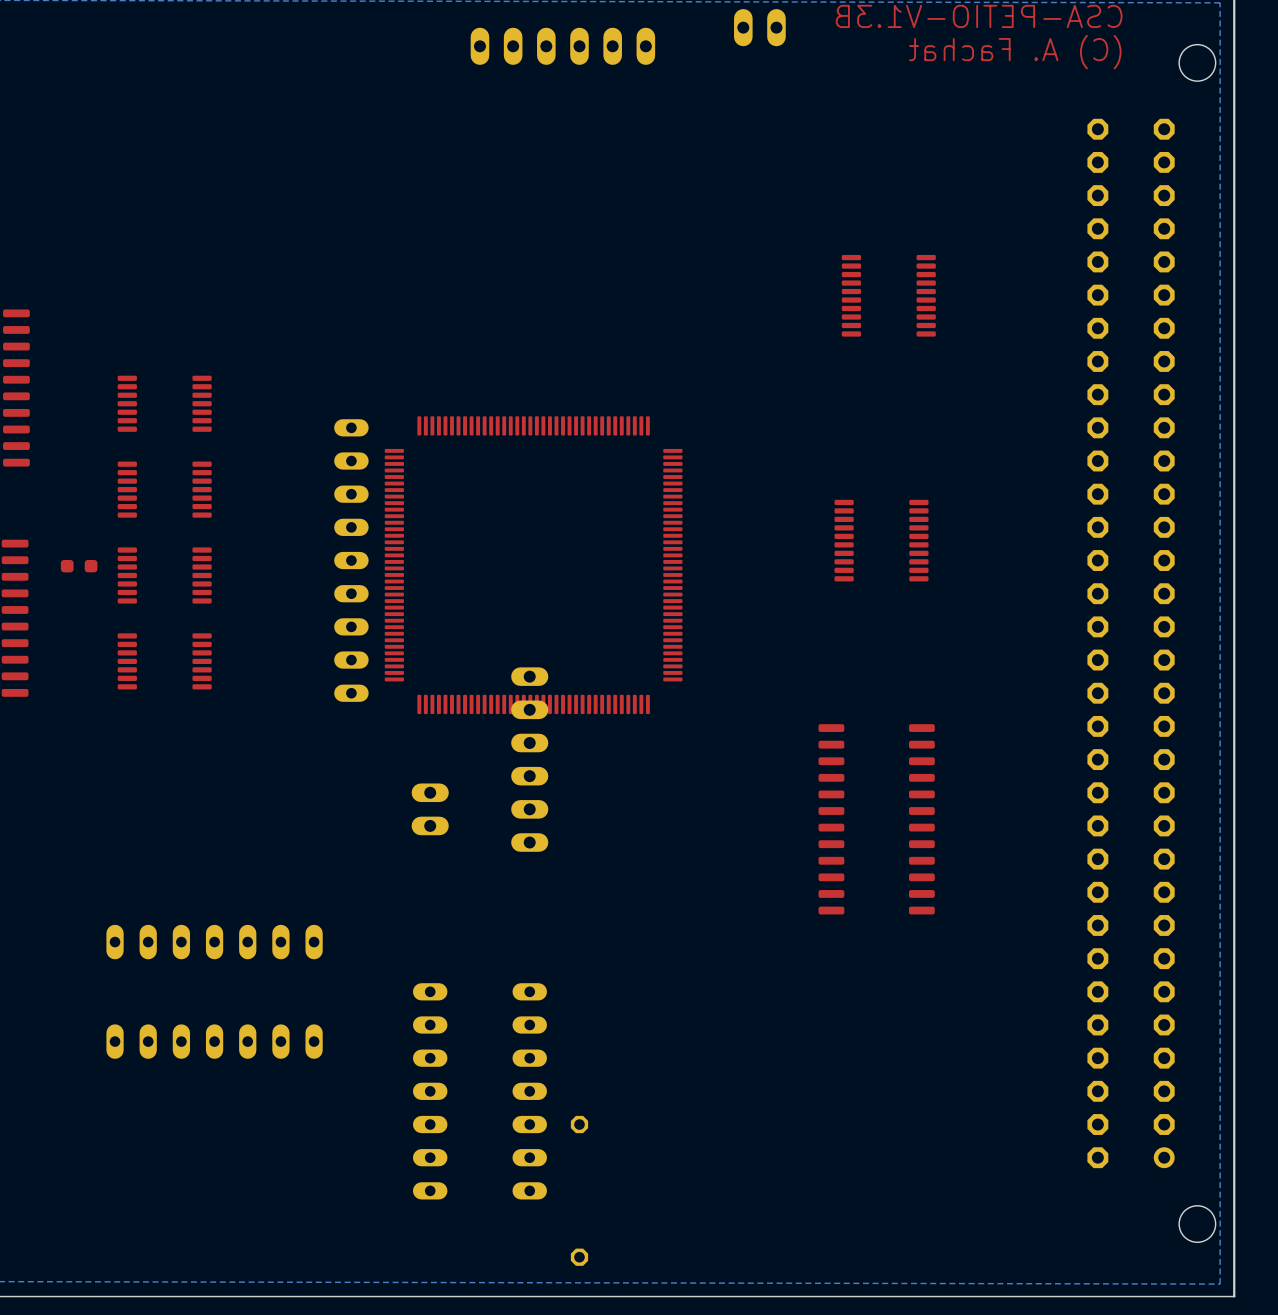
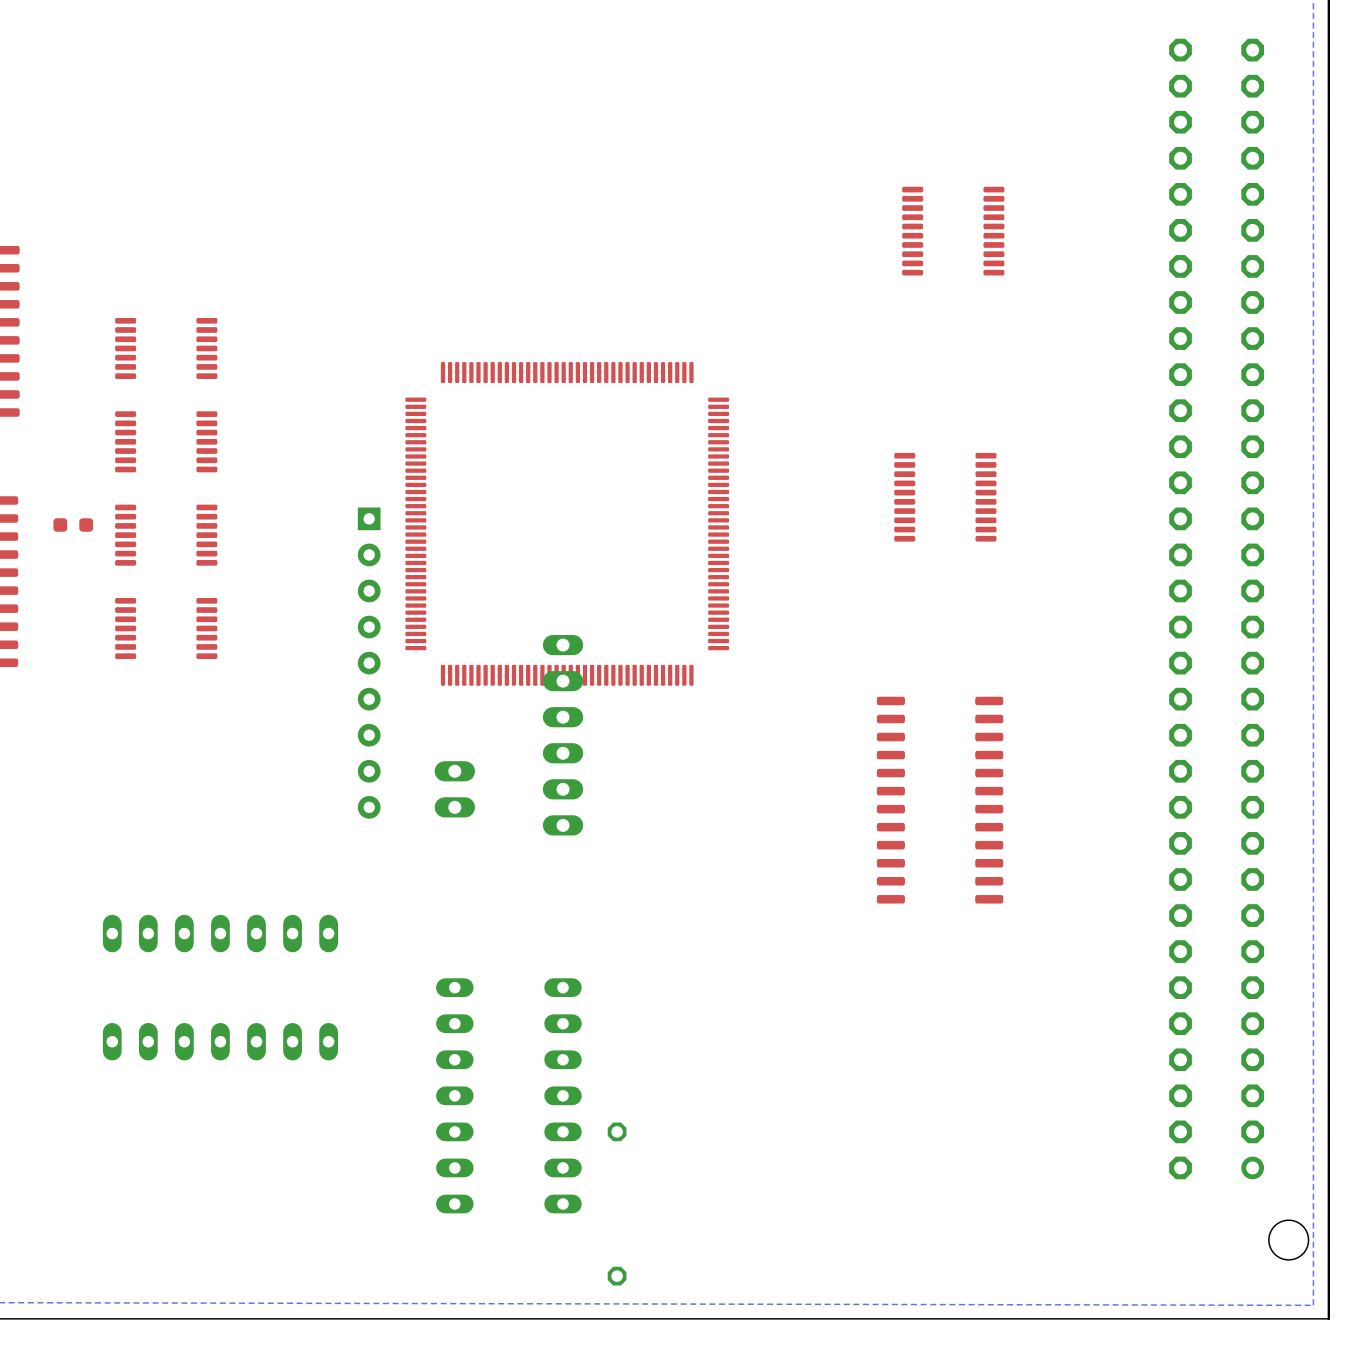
part: (351, 560) -> none
part: none -> (369, 663)

